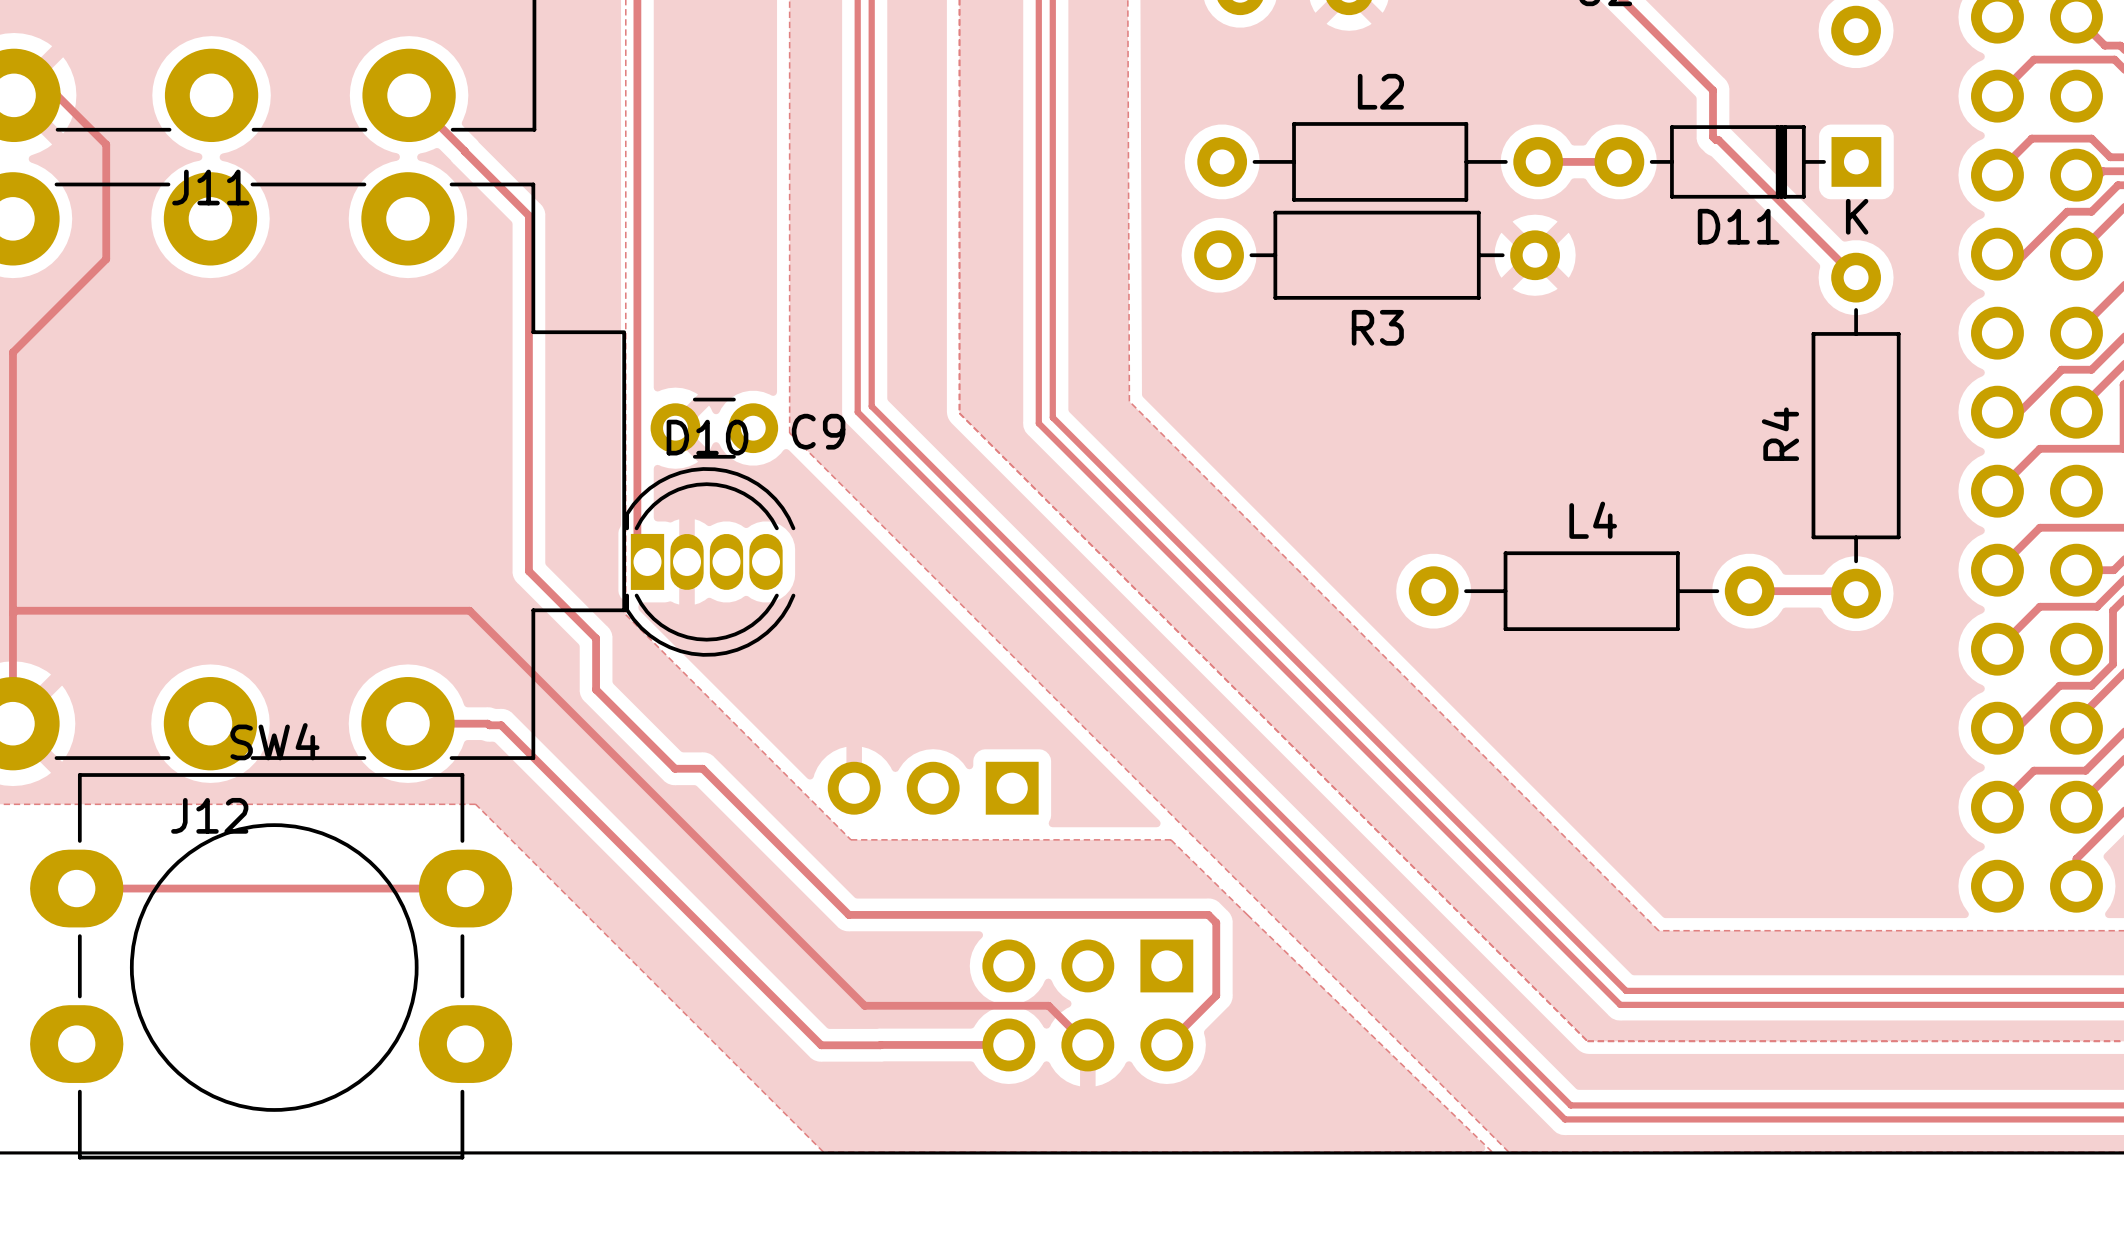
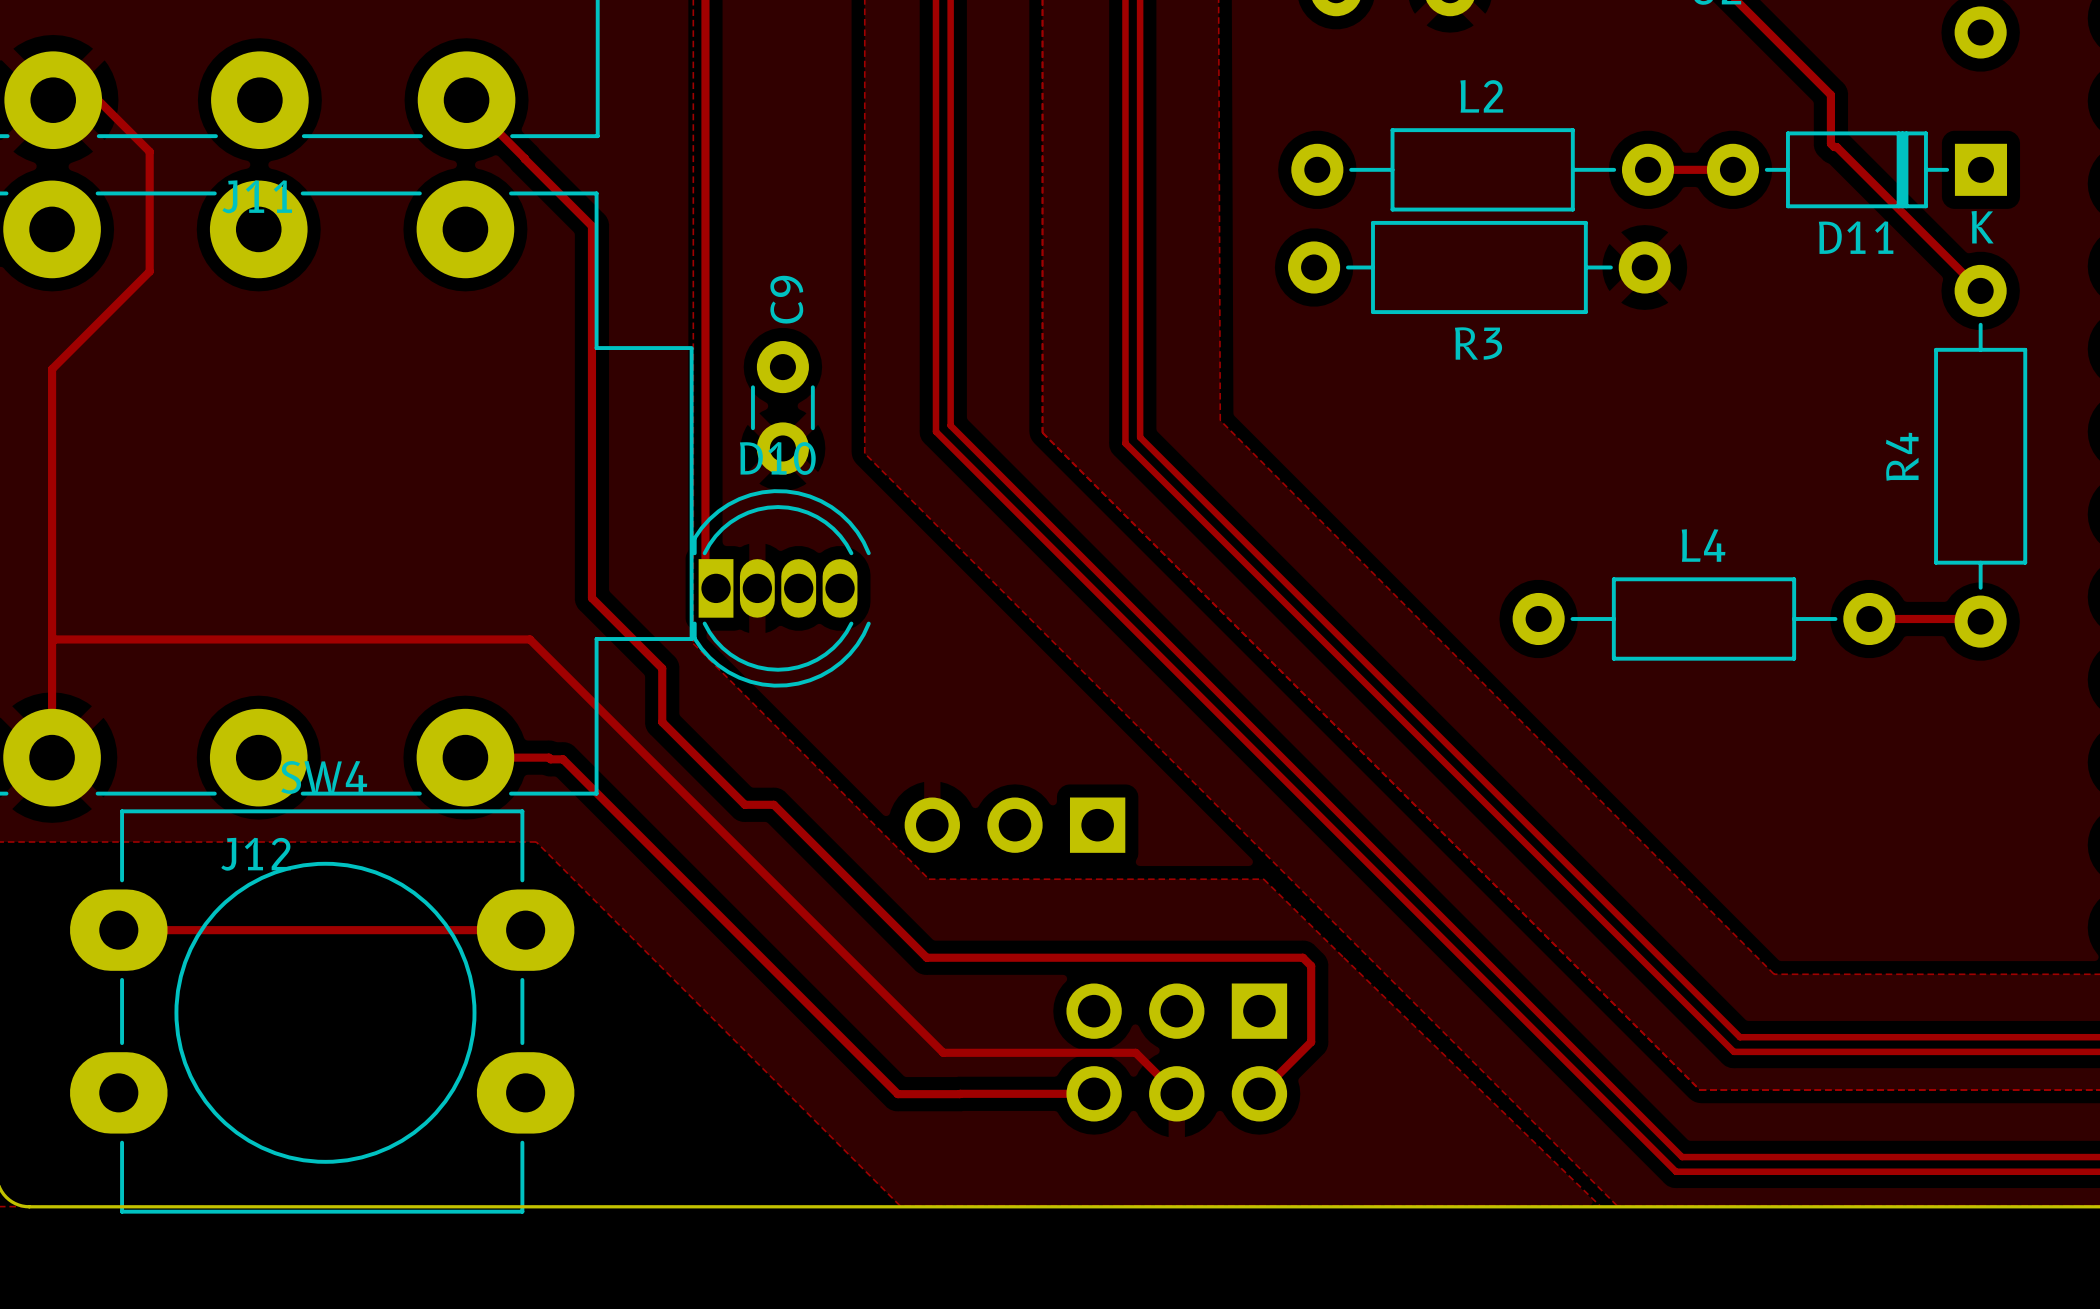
C9 rotation: 0° (714, 428) -> 90° clockwise (782, 407)
C9 name position: C9 (818, 431) -> C9 (786, 299)

